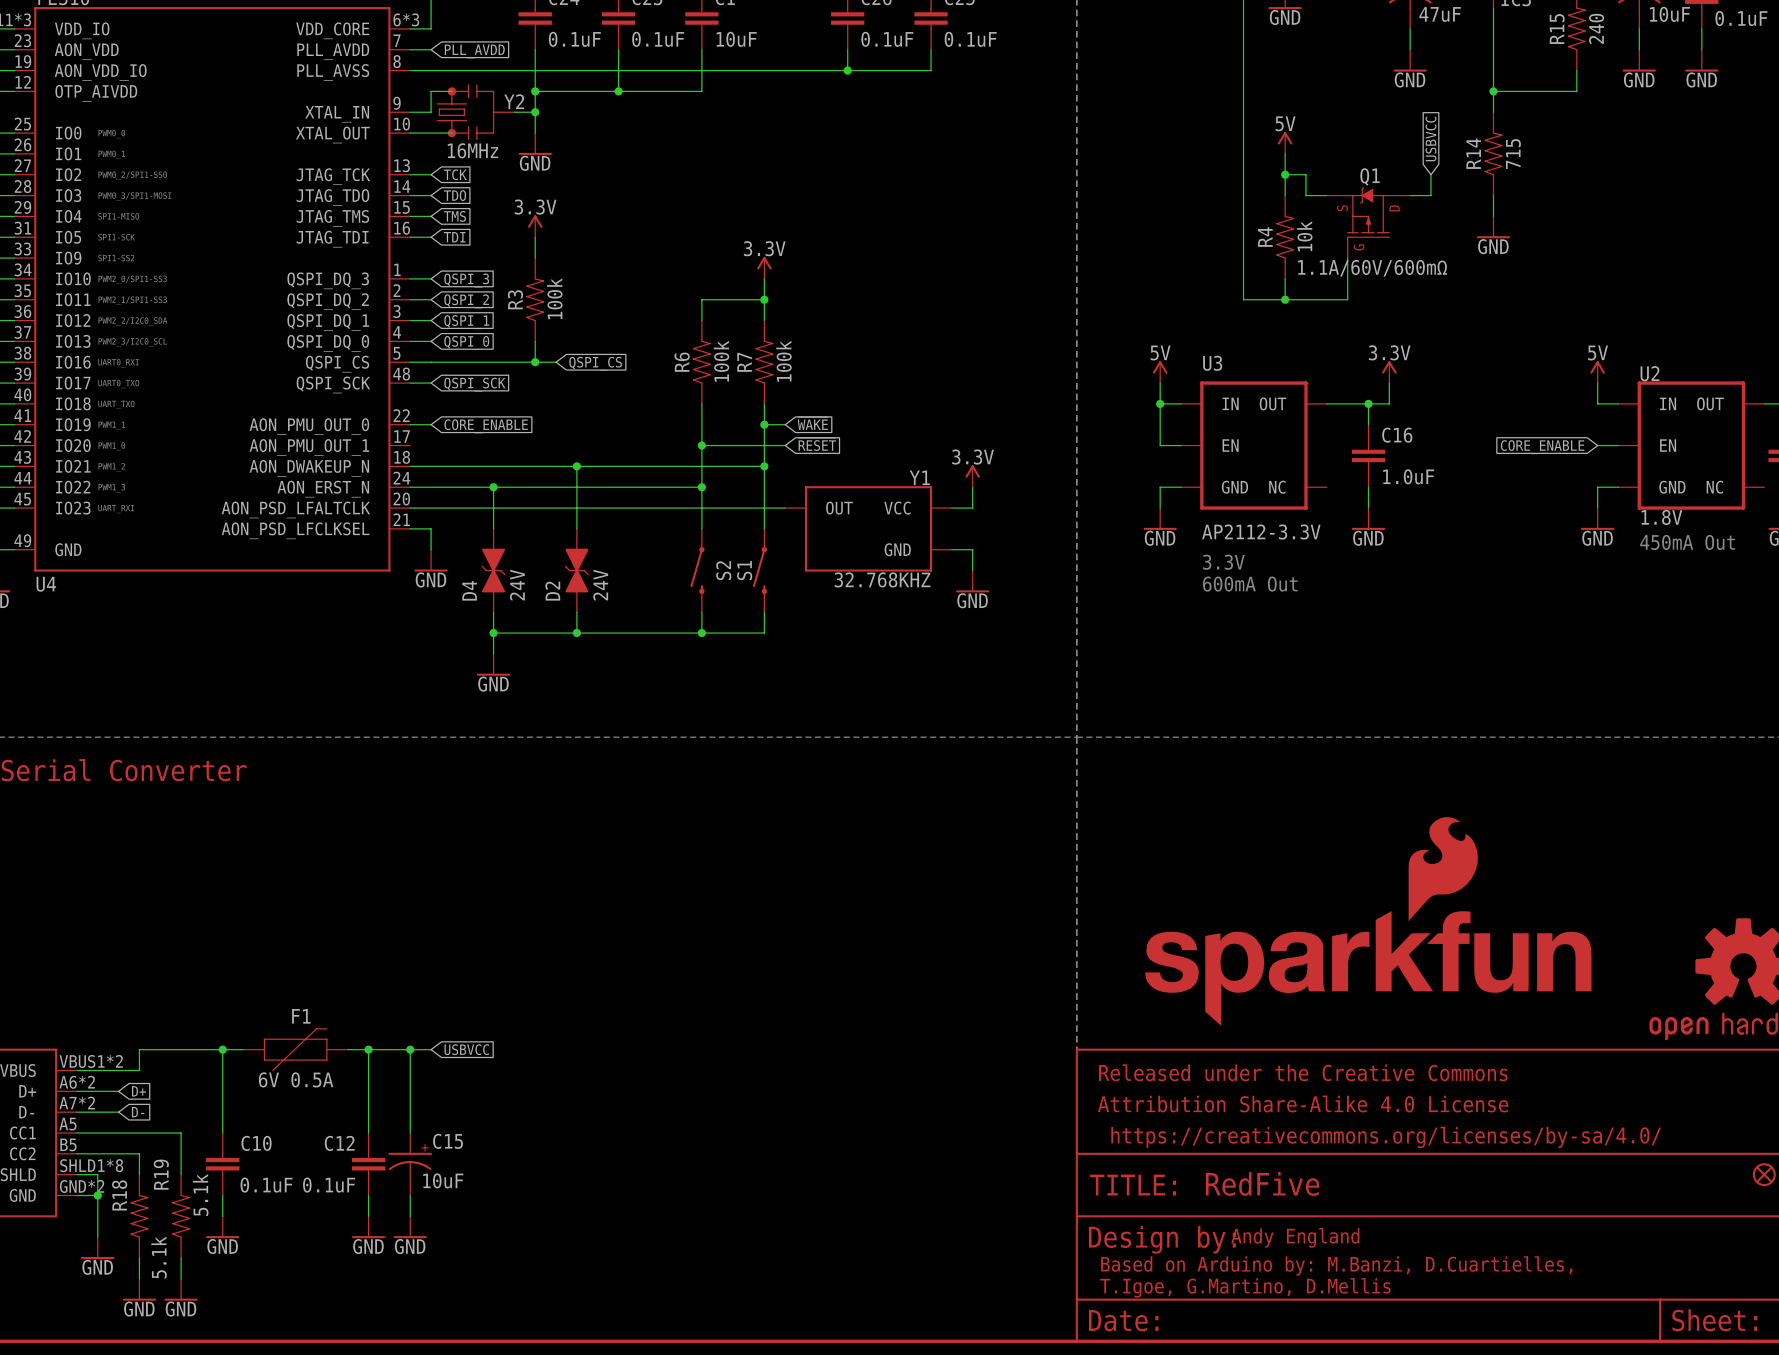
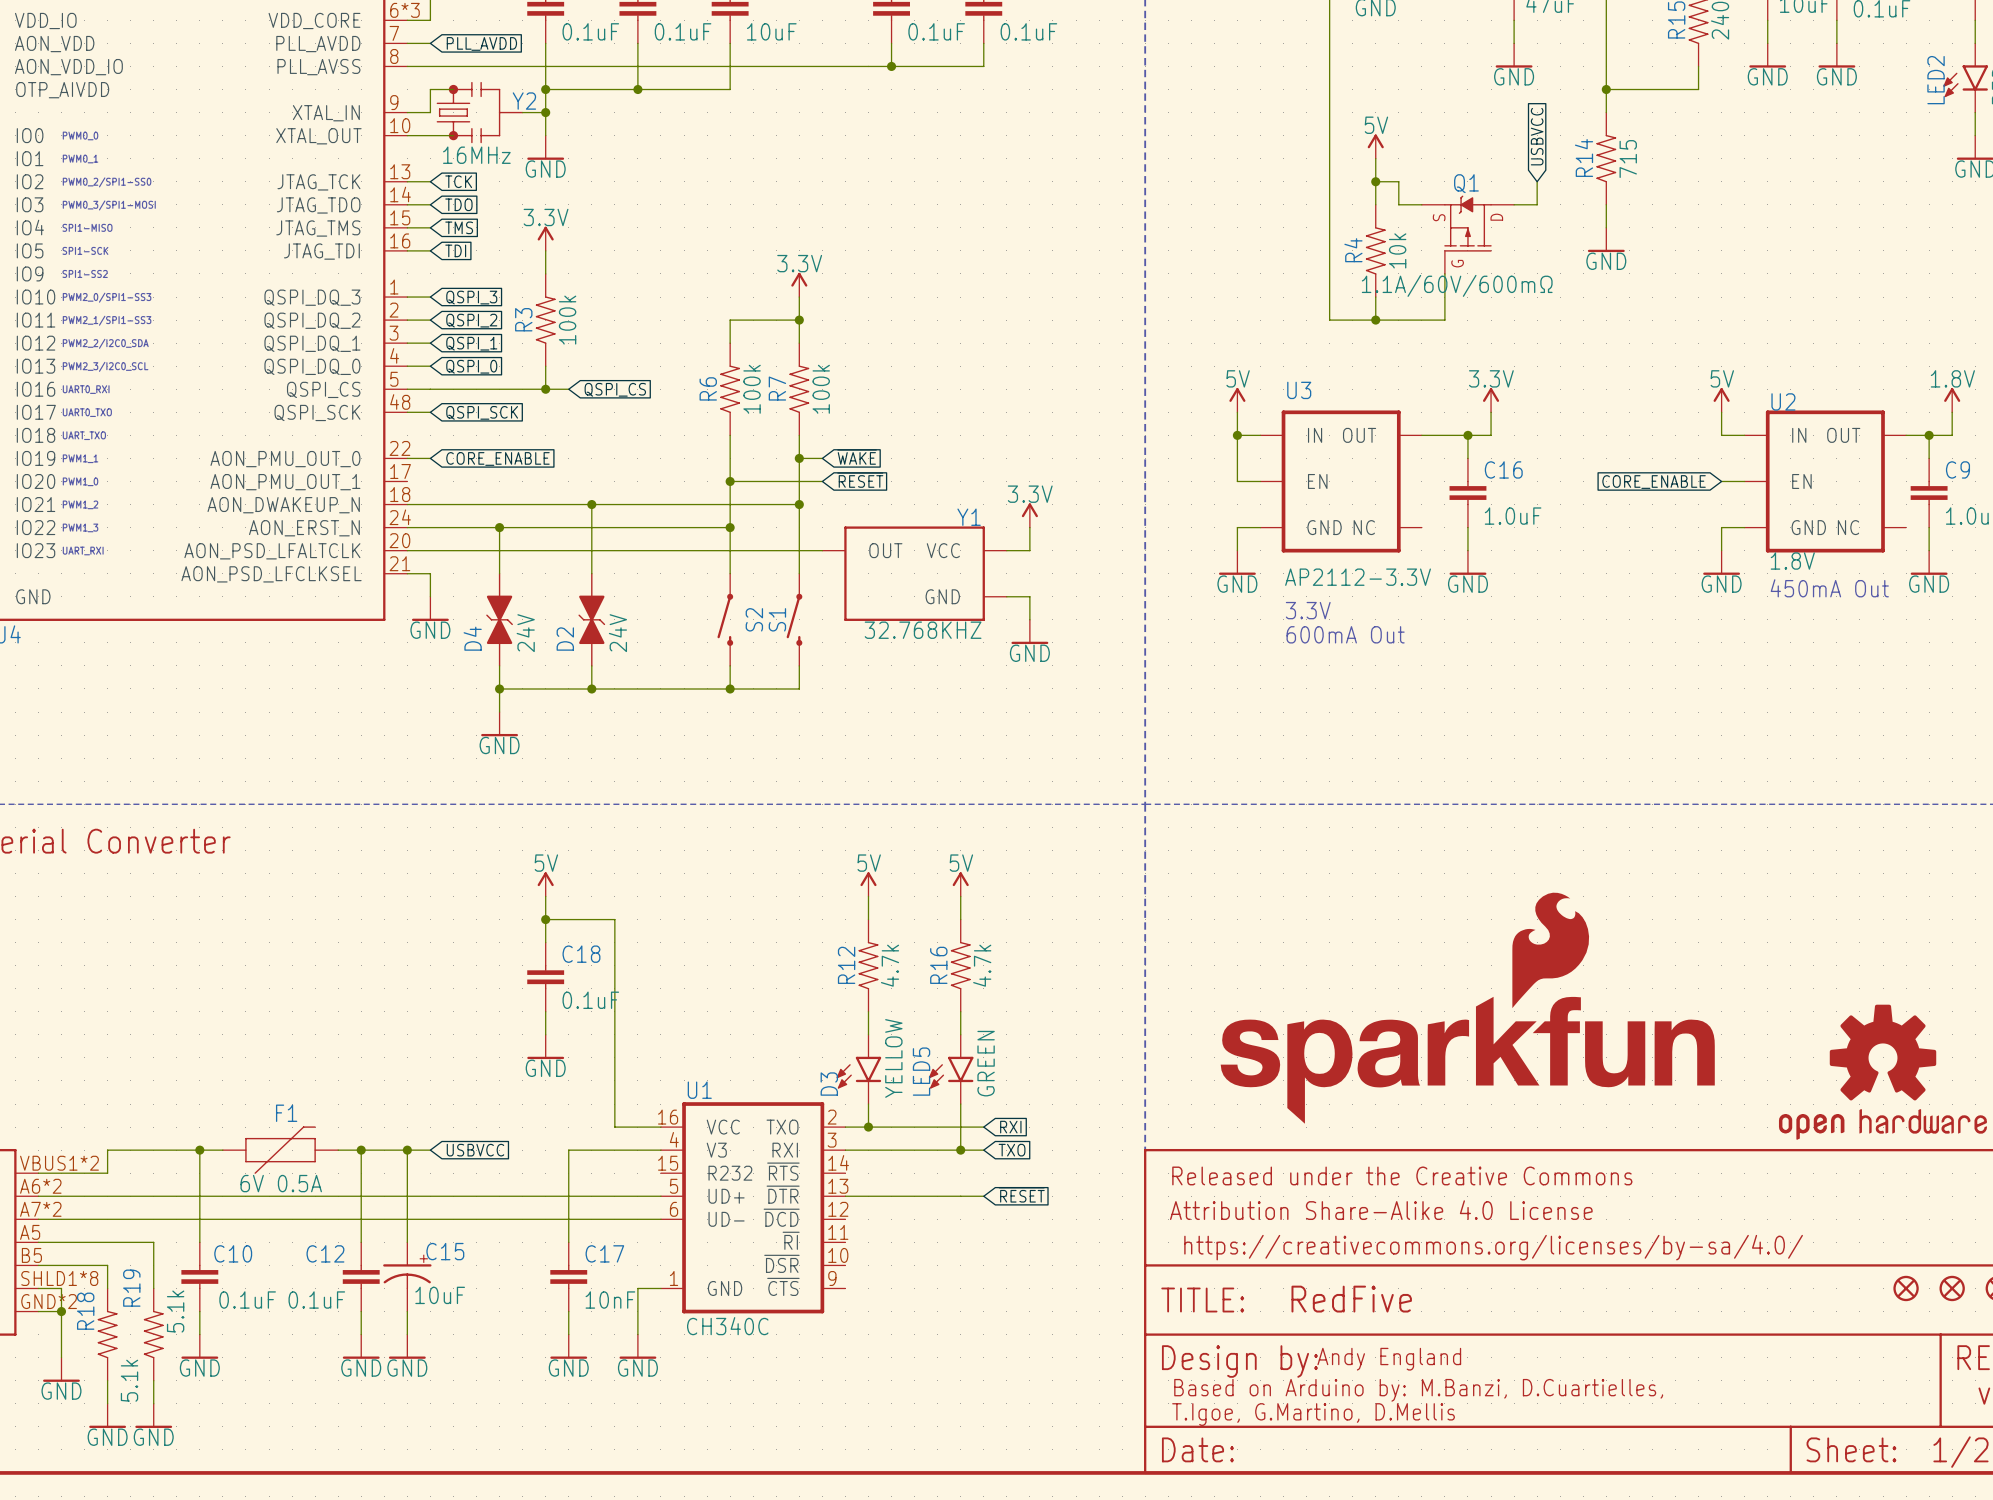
power symbol: none -> 5V (545, 884)
power symbol: none -> 5V (868, 884)
power symbol: none -> 5V (960, 884)
wire: none -> (545, 896) (545, 942)
wire: none -> (868, 896) (868, 919)
wire: none -> (960, 896) (960, 919)
wire: none -> (545, 919) (614, 919) (614, 1127) (660, 1127)
junction: none -> (545, 919)
R12: none -> 4.7k (868, 965)
R16: none -> 4.7k (960, 965)
C18: none -> 0.1uF (545, 977)
wire: none -> (545, 1011) (545, 1034)
wire: none -> (868, 1011) (868, 1034)
wire: none -> (960, 1011) (960, 1034)
power symbol: none -> GND (545, 1046)
D3: none -> YELLOW (858, 1069)
LED5: none -> GREEN (951, 1069)
wire: none -> (868, 1104) (868, 1127)
wire: none -> (960, 1104) (960, 1150)
wire: none -> (845, 1127) (983, 1127)
junction: none -> (868, 1127)
global label: none -> RXI (1010, 1127)
wire: none -> (660, 1150) (568, 1150) (568, 1242)
wire: none -> (845, 1150) (983, 1150)
junction: none -> (960, 1150)
global label: none -> TXO (1012, 1150)
global label: none -> ~{RESET} (1021, 1194)
wire: none -> (84, 1196) (660, 1196)
global label: D+ (138, 1091) -> none
wire: none -> (845, 1196) (983, 1196)
U1: none -> CH340C (753, 1207)
wire: none -> (84, 1219) (660, 1219)
global label: D- (138, 1112) -> none
C17: none -> 10nF (568, 1276)
wire: none -> (660, 1288) (637, 1288) (637, 1334)
wire: none -> (568, 1311) (568, 1334)
power symbol: none -> GND (568, 1346)
power symbol: none -> GND (637, 1346)

